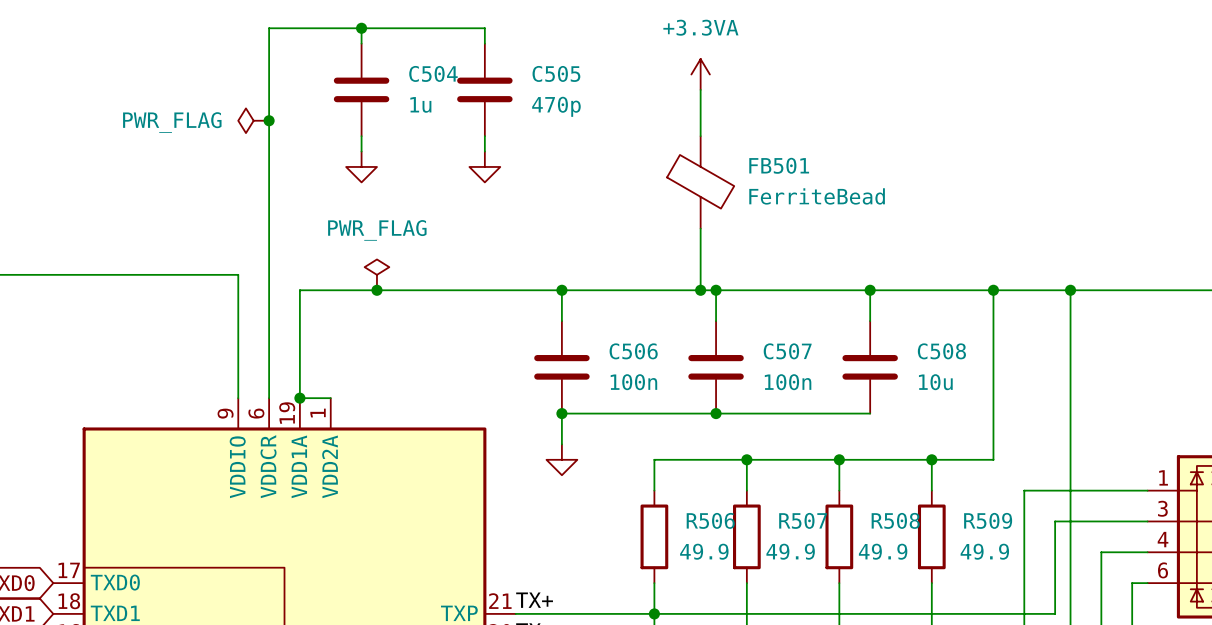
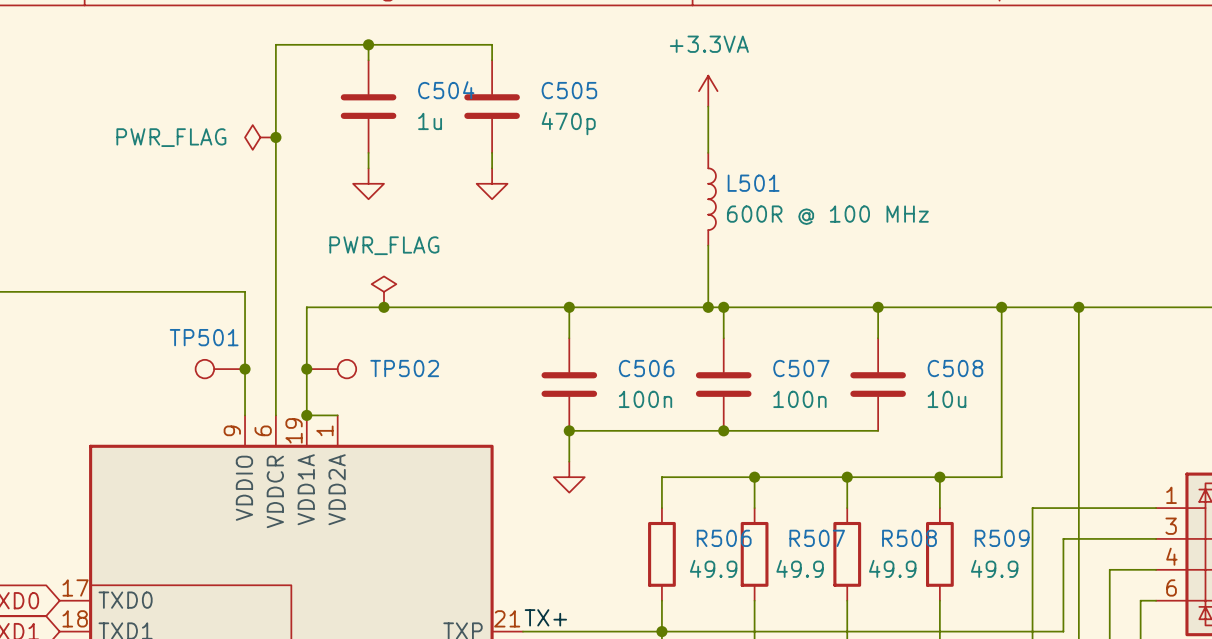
FB501: FerriteBead (700, 182) -> none
L501: none -> 600R @ 100 MHz (712, 199)
TP501: none -> (220, 369)
junction: none -> (245, 369)
junction: none -> (306, 369)
TP502: none -> (331, 369)

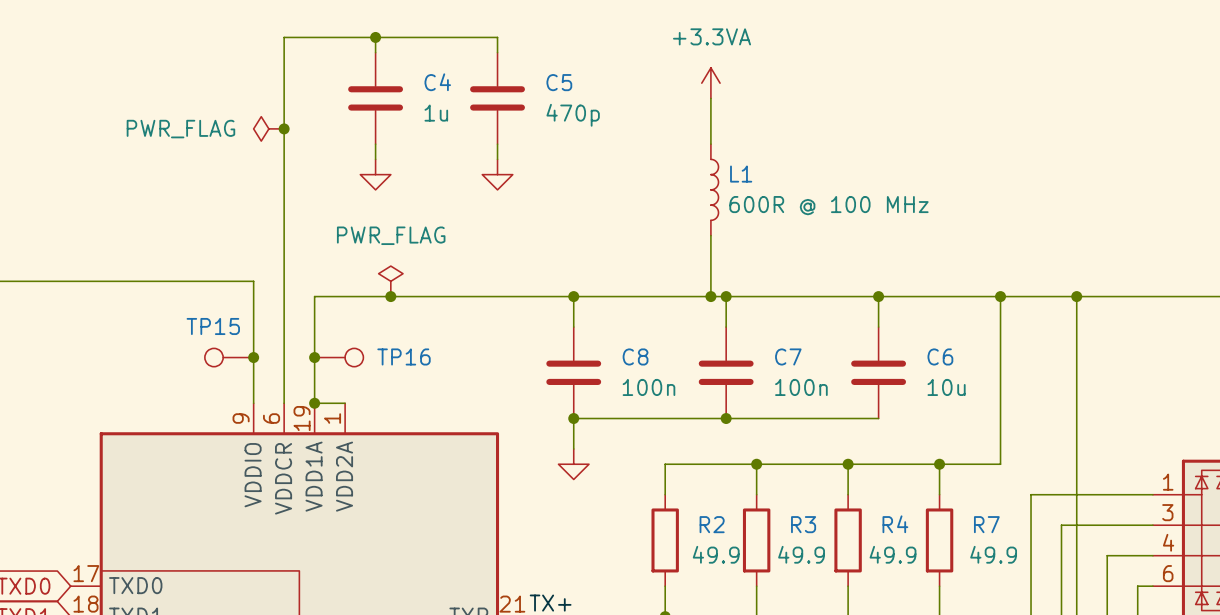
C504 name: C504 (446, 90) -> C4 (437, 82)
C505 name: C505 (569, 90) -> C5 (559, 82)
L501 name: L501 (753, 183) -> L1 (741, 174)
TP501 name: TP501 (204, 337) -> TP15 (213, 326)
TP502 name: TP502 (404, 368) -> TP16 (404, 356)
C506 name: C506 (646, 368) -> C8 (635, 356)
C507 name: C507 (801, 368) -> C7 (788, 356)
C508 name: C508 (955, 368) -> C6 (940, 356)
R506 name: R506 (724, 538) -> R2 (712, 524)
R507 name: R507 (817, 538) -> R3 (803, 524)
R508 name: R508 (909, 538) -> R4 (895, 524)
R509 name: R509 (1002, 538) -> R7 (986, 524)

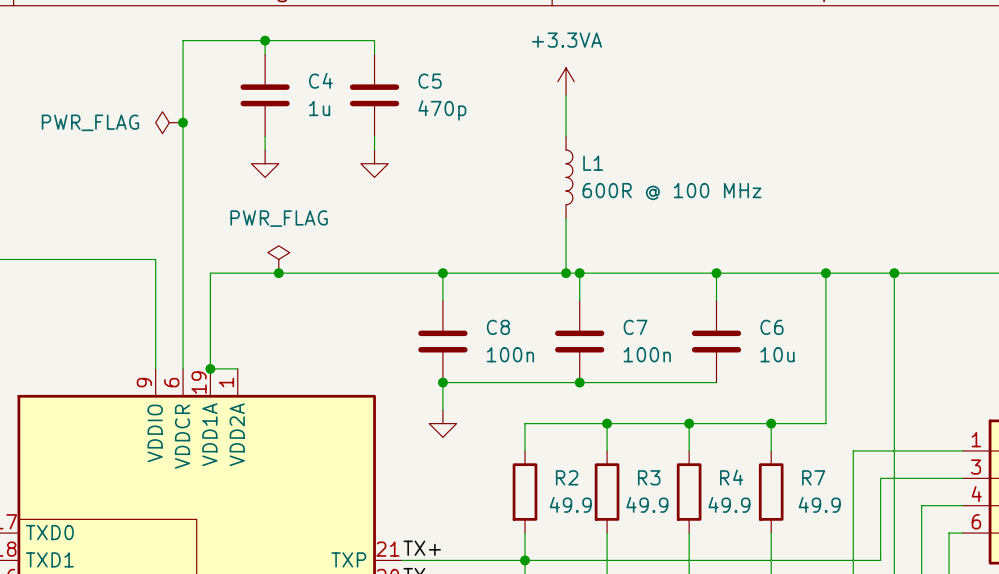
TP15: (229, 357) -> none
junction: (253, 357) -> none
junction: (314, 357) -> none
TP16: (339, 357) -> none

